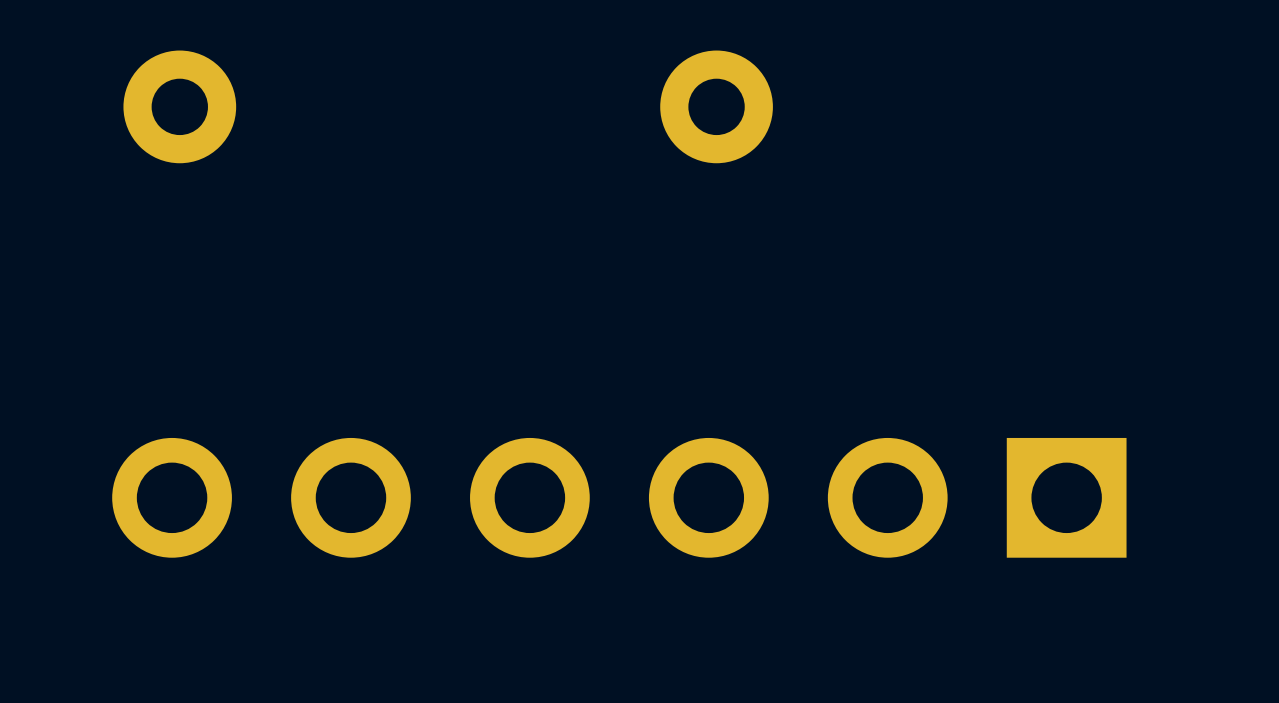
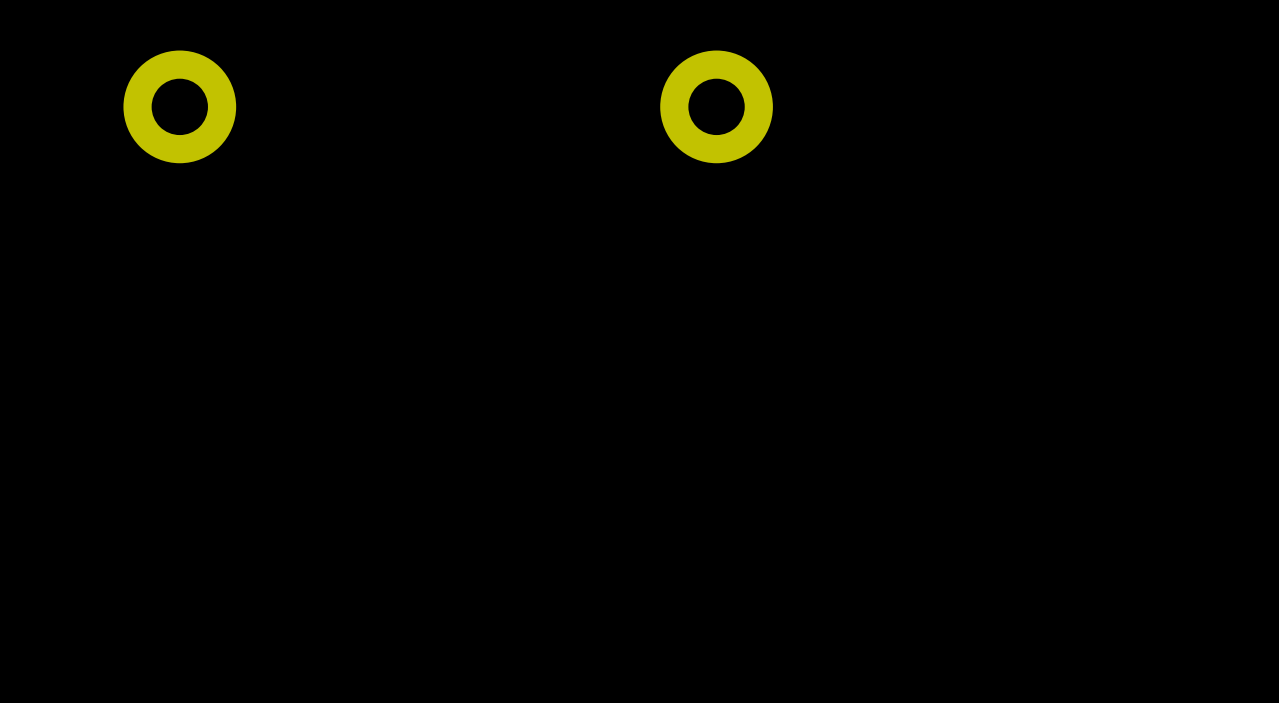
part: (619, 497) -> none

